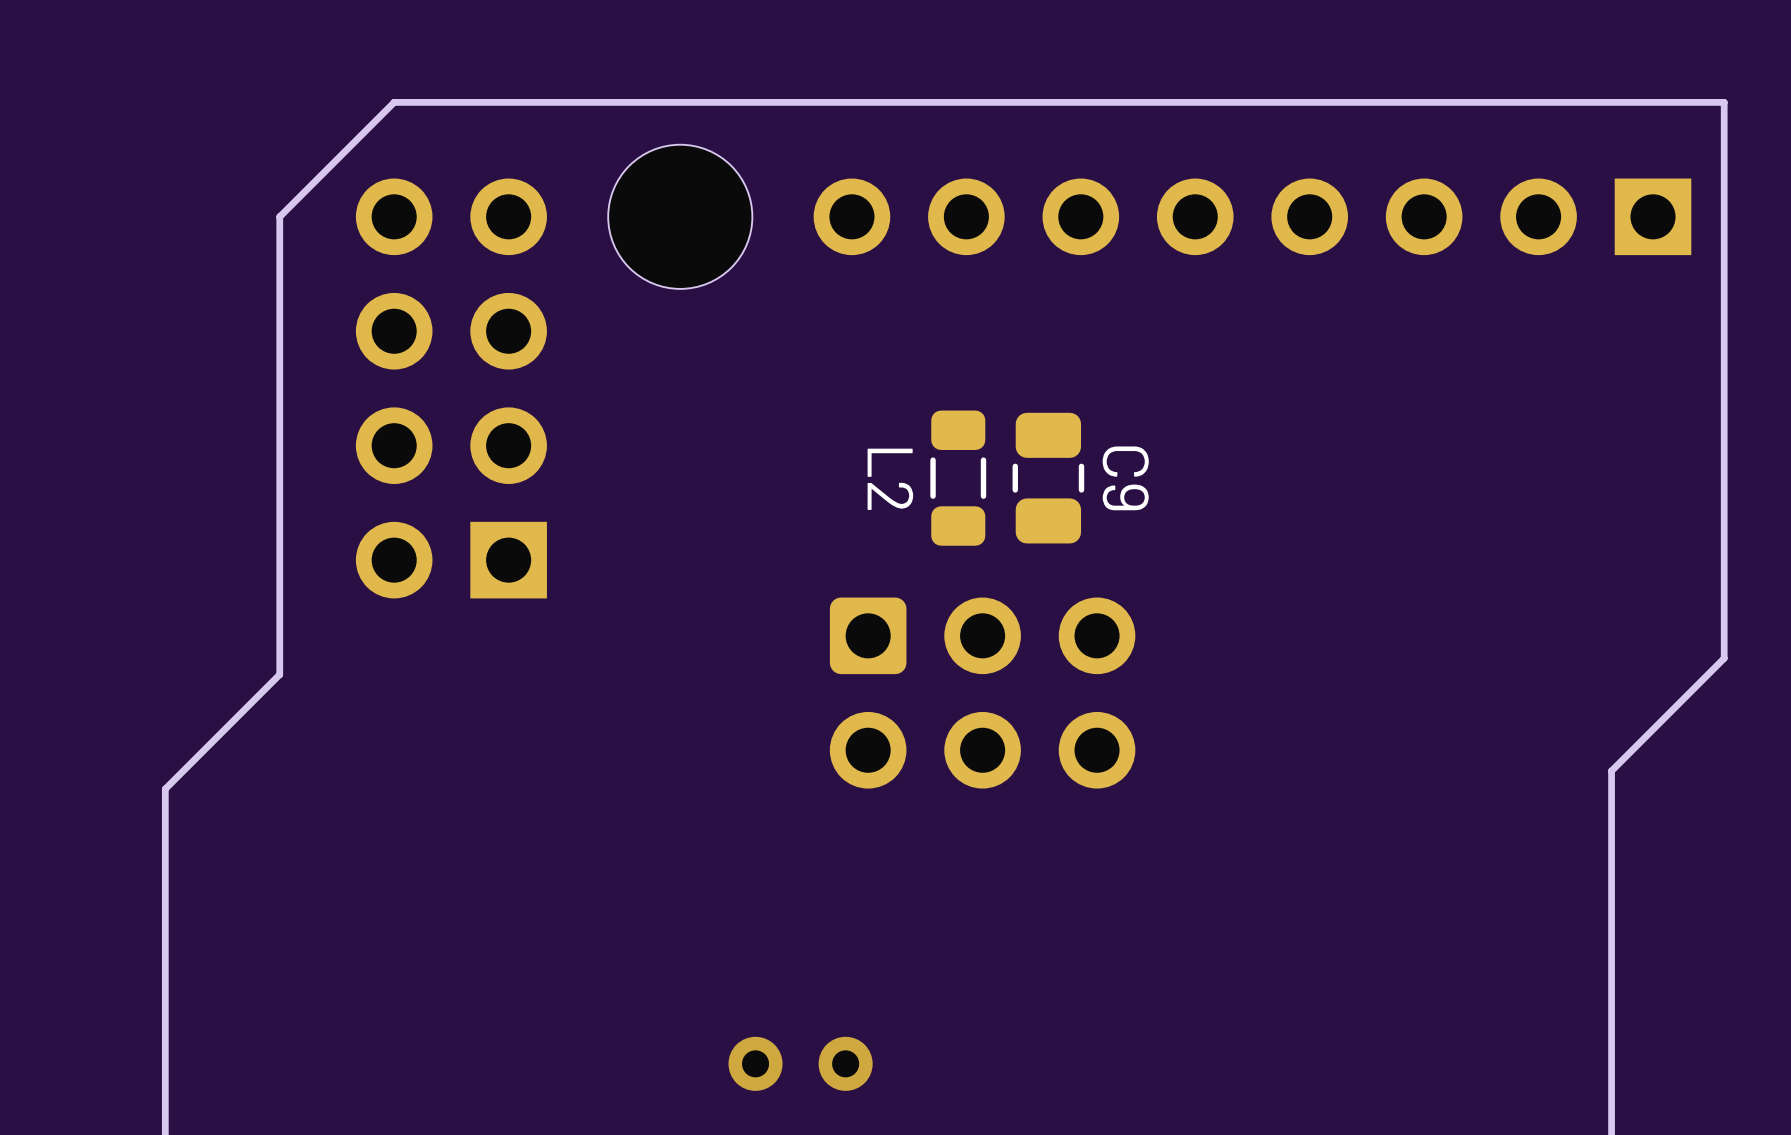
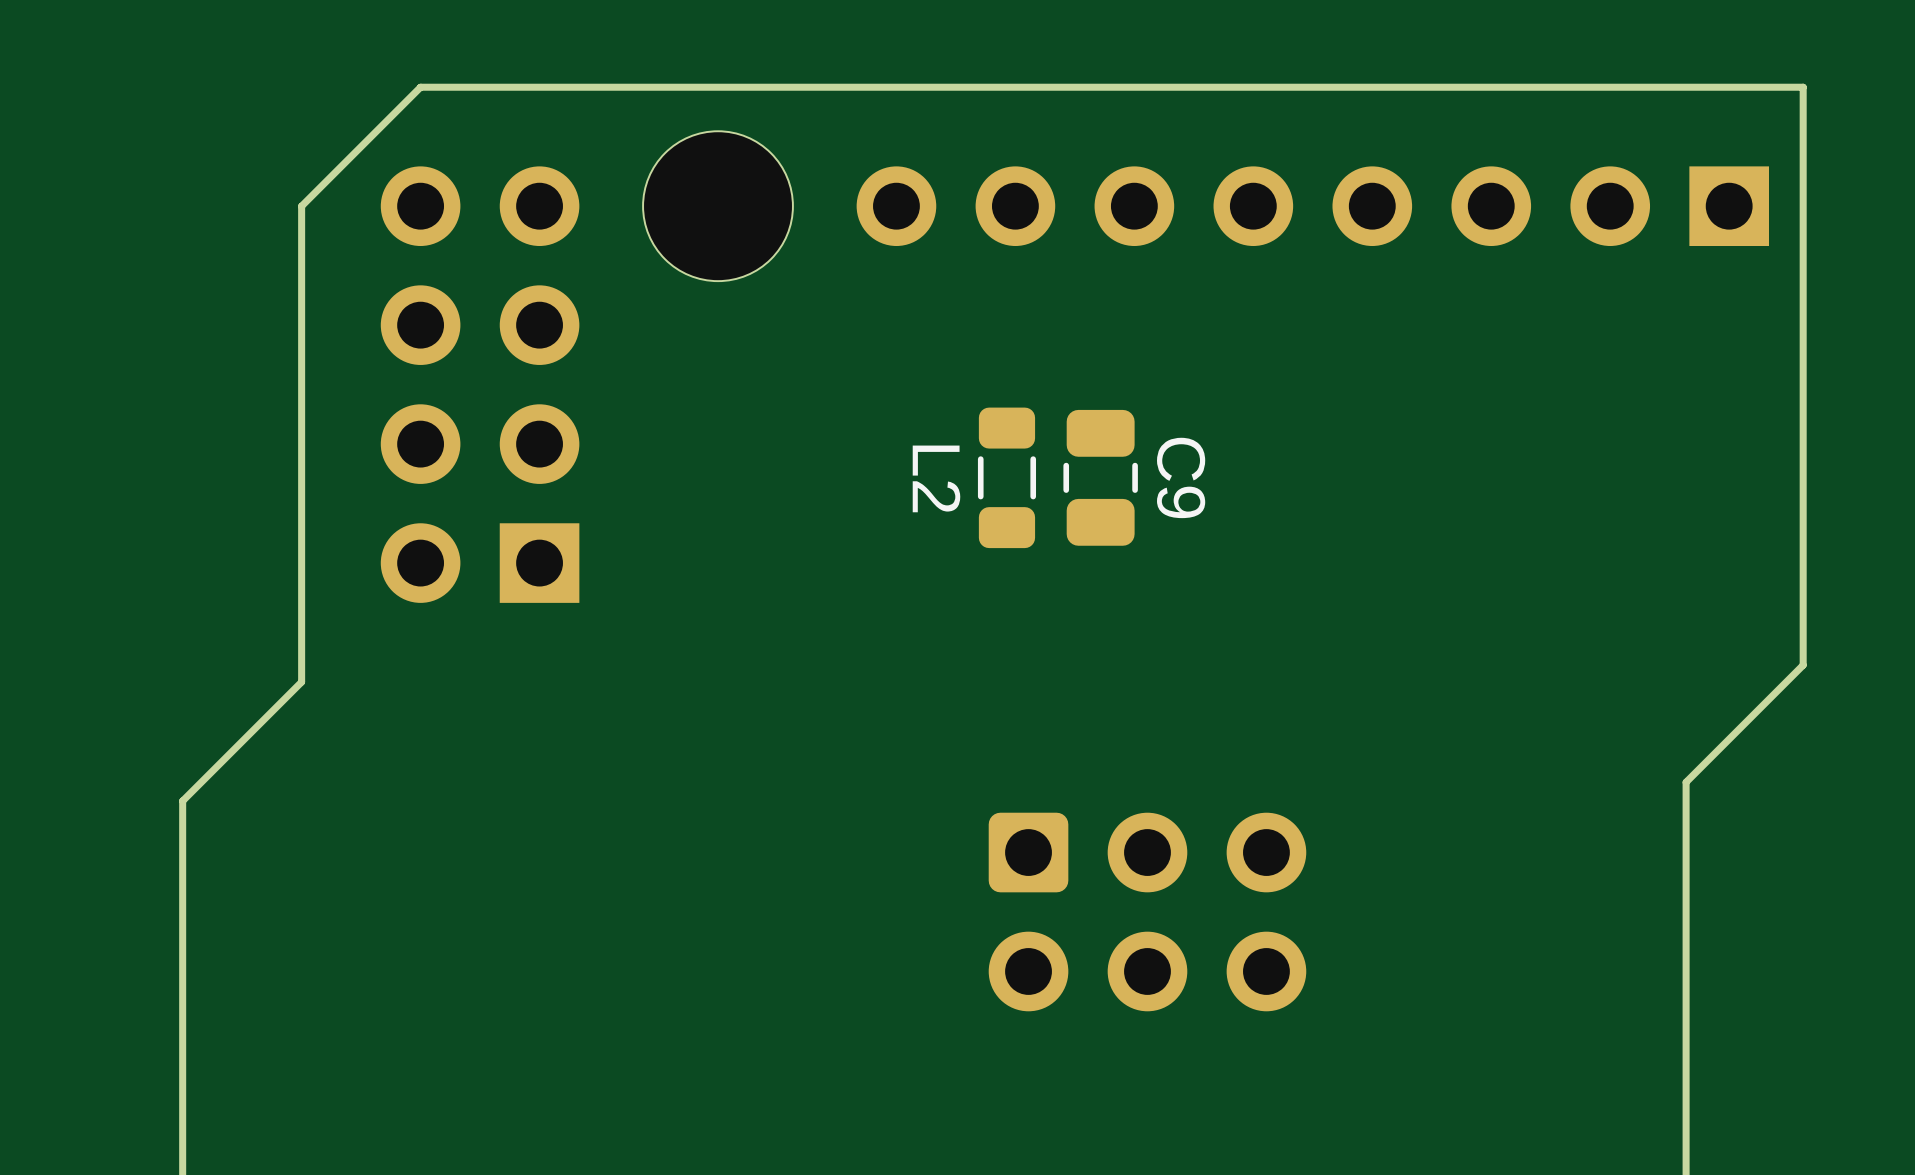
part position: (982, 693) -> (1147, 912)
via: (755, 1063) -> none
via: (845, 1063) -> none

